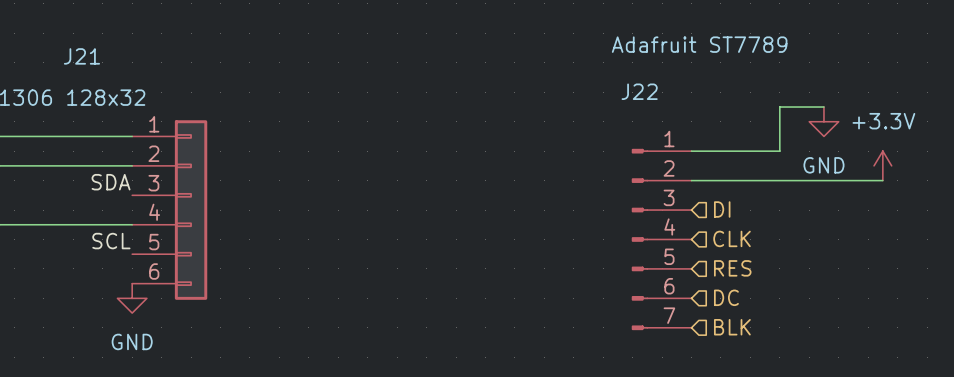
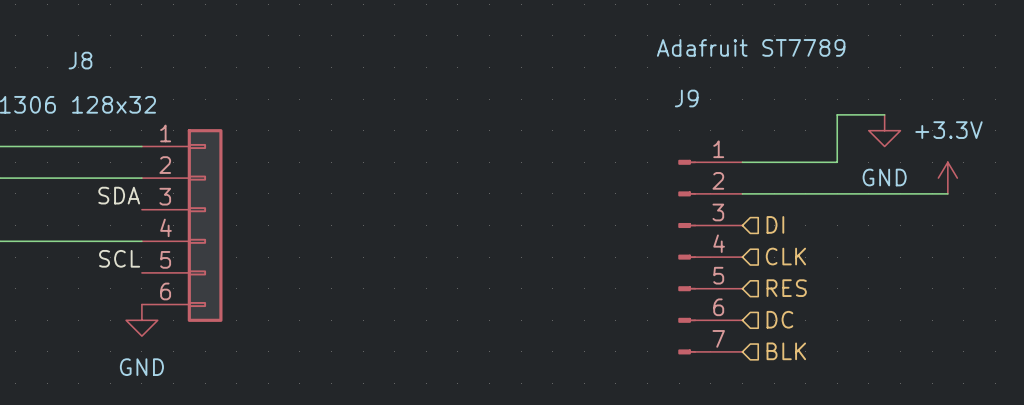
J21 name: J21 (81, 56) -> J8 (80, 60)
J22 name: J22 (639, 91) -> J9 (686, 98)

